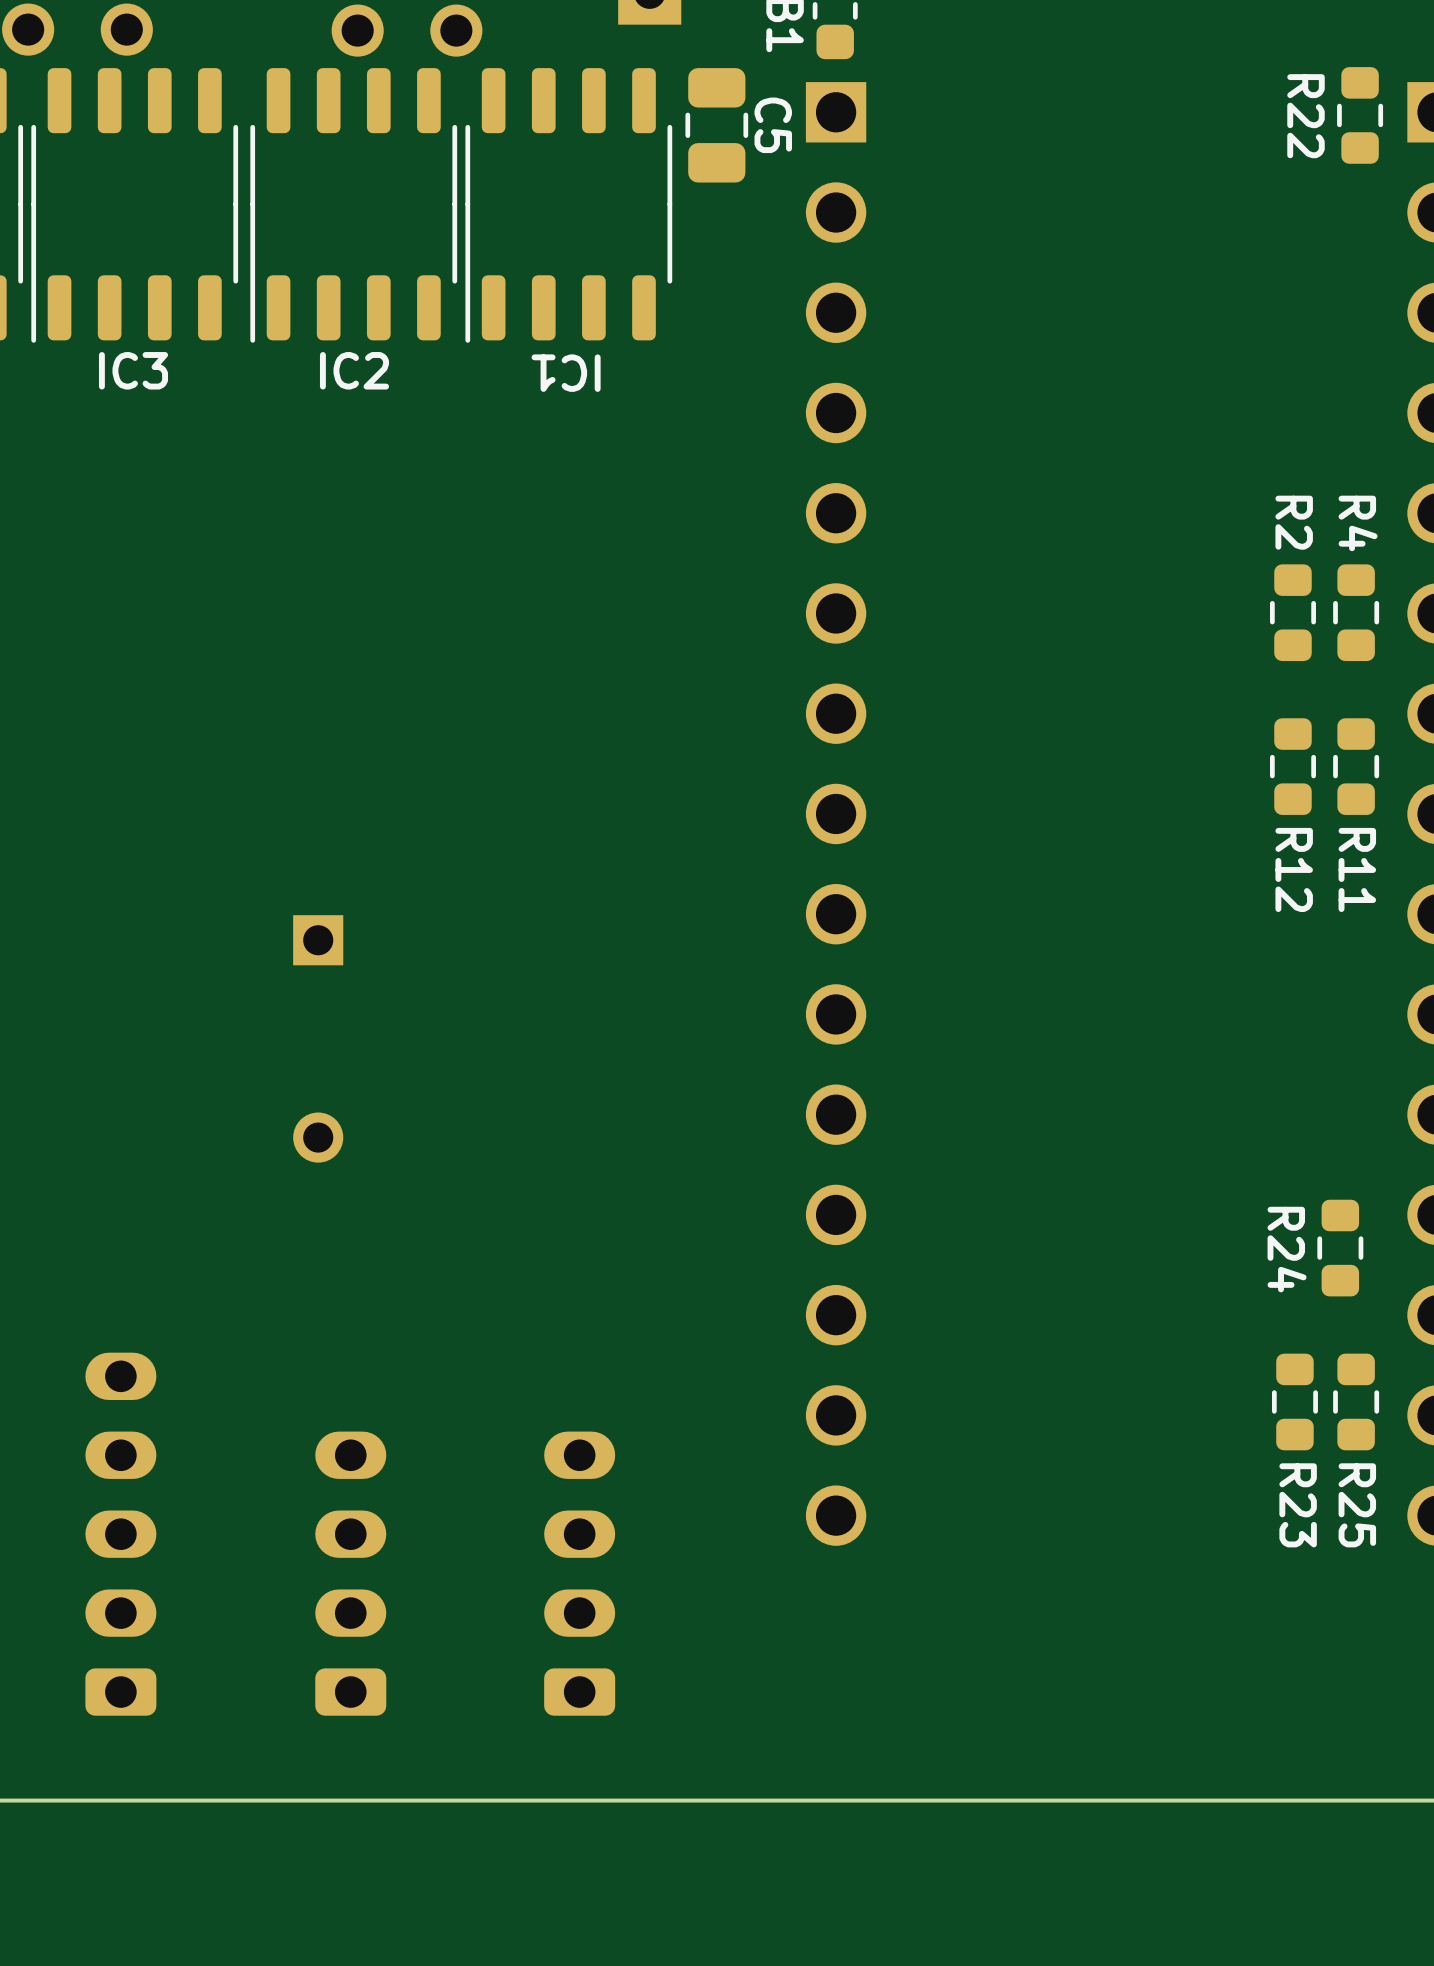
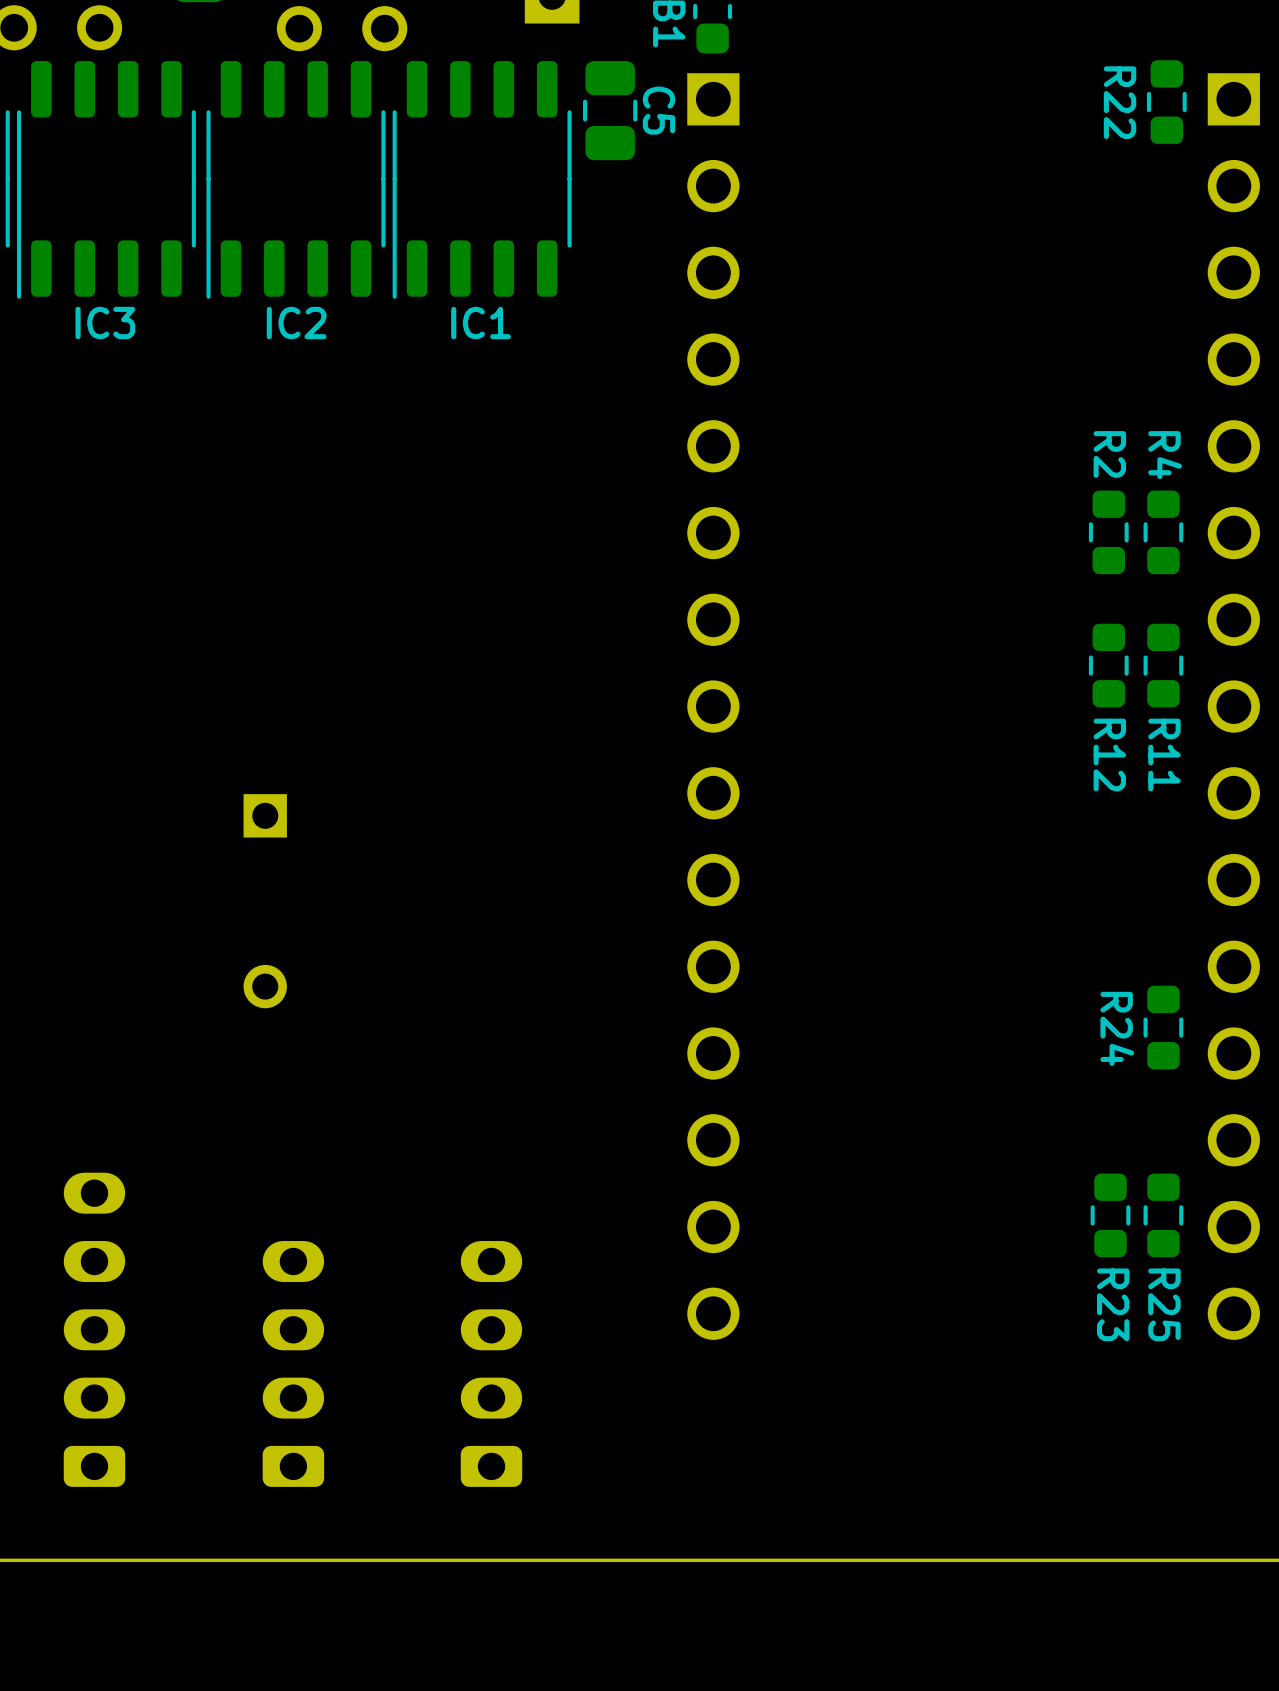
IC1 name rotation: 0° (566, 373) -> 180° (481, 323)
R24 position: (1340, 1248) -> (1163, 1027)

